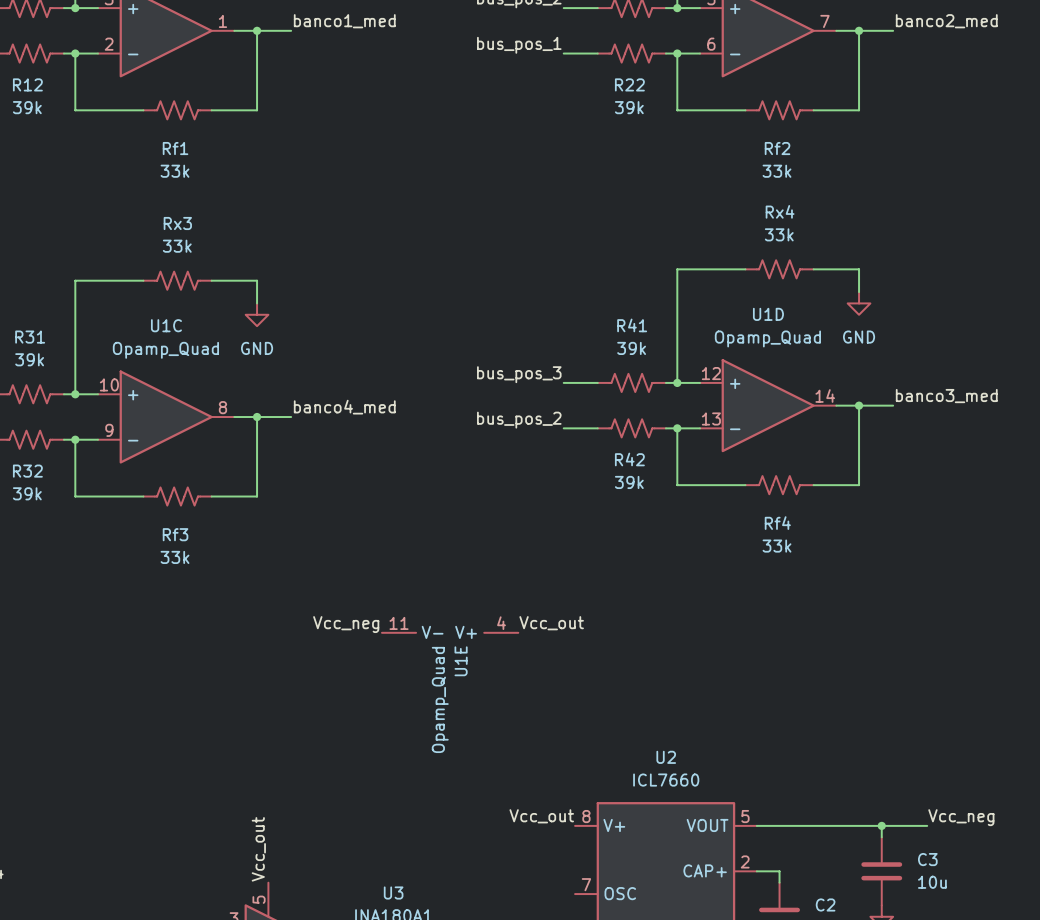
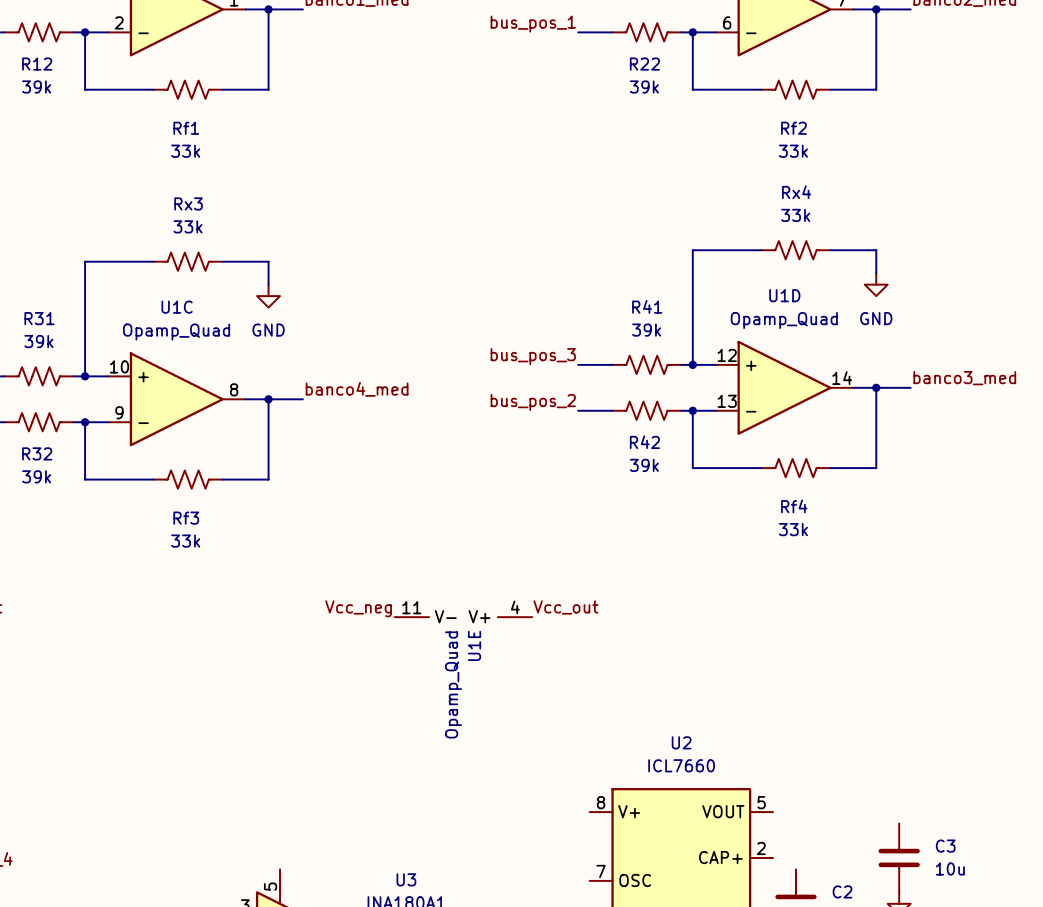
label: Vcc_out (541, 816) -> none
label: Vcc_neg (961, 817) -> none
wire: (756, 825) (927, 825) -> none
wire: (881, 825) (881, 837) -> none
junction: (881, 825) -> none
label: Vcc_out (258, 849) -> none
wire: (756, 871) (779, 871) (779, 882) -> none

